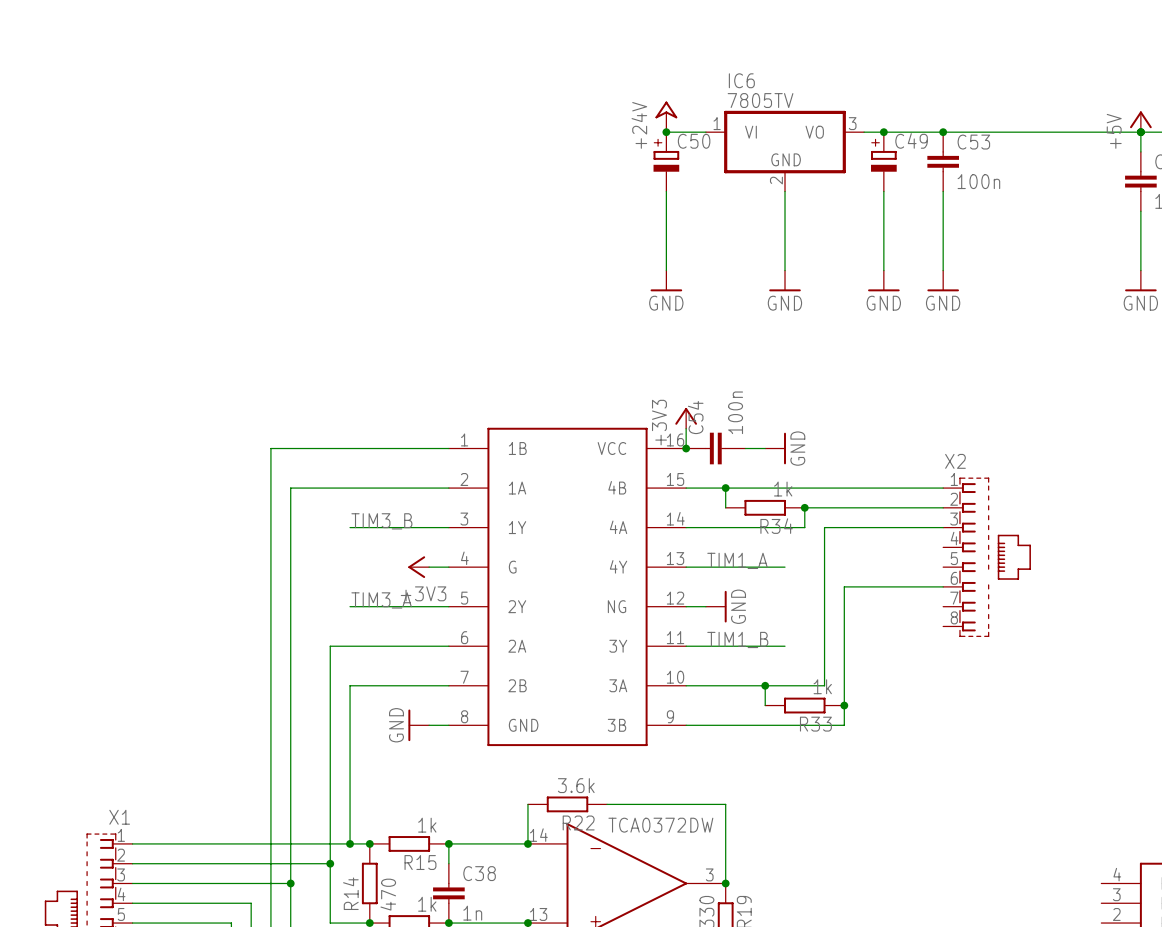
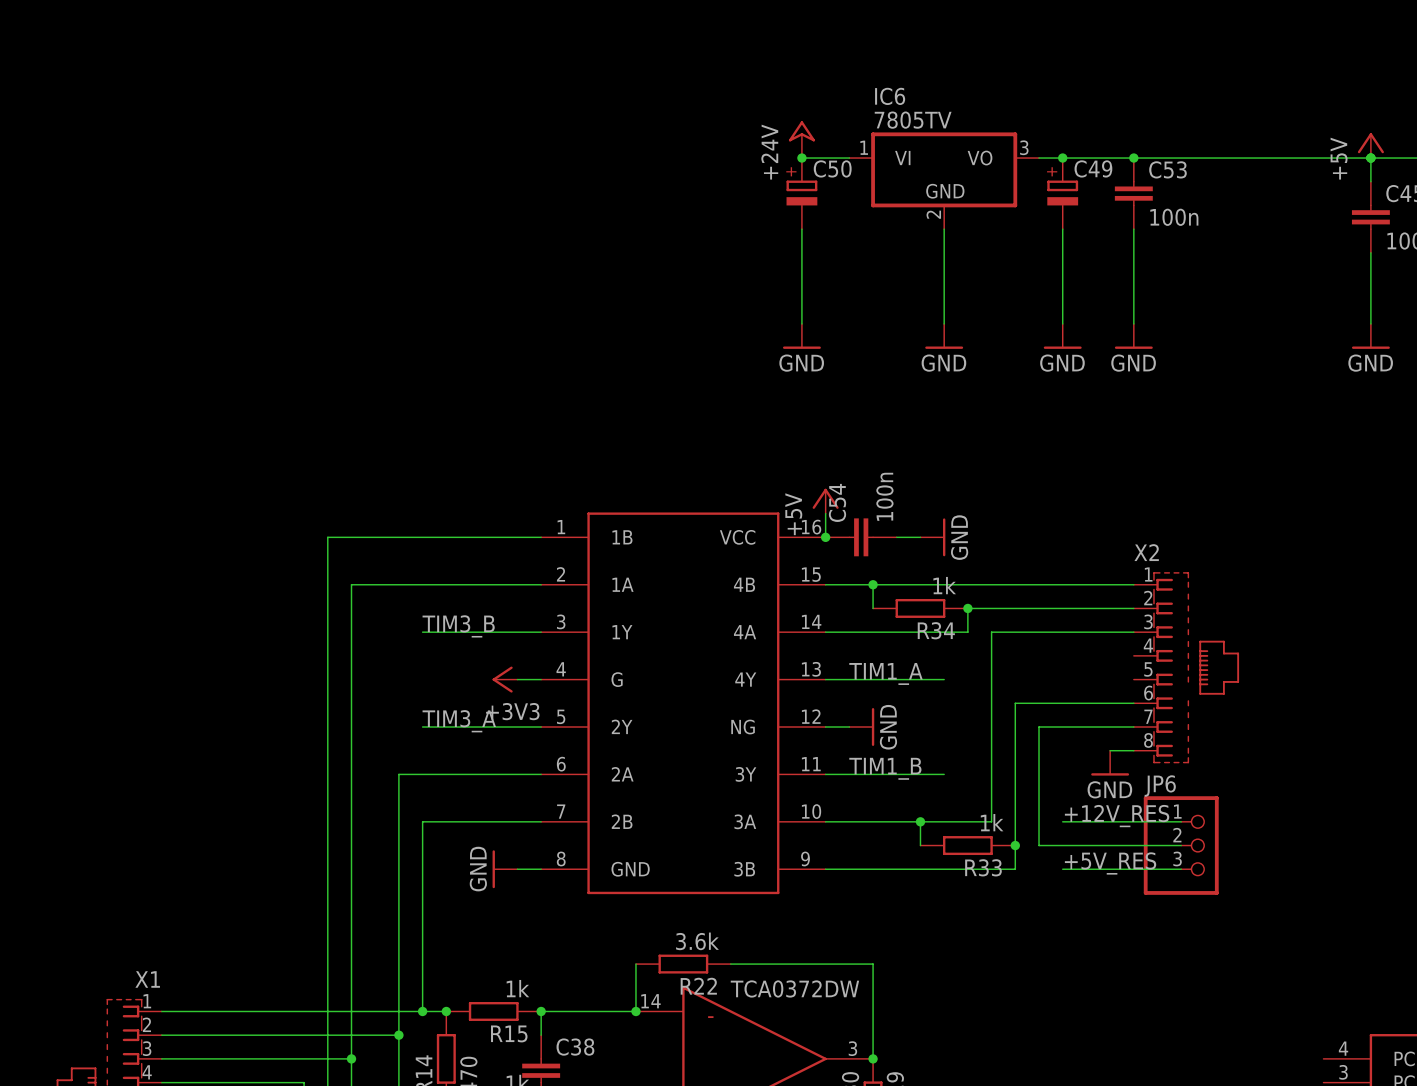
power symbol: +3V3 (686, 418) -> +5V (825, 501)
wire: none -> (1133, 727) (1039, 727) (1039, 845) (1181, 845)
wire: none -> (1110, 750) (1133, 750)
power symbol: none -> GND (1110, 763)
label: none -> +12V_RES (1117, 816)
wire: none -> (1062, 821) (1181, 821)
JP6: none -> (1181, 845)
label: none -> +5V_RES (1110, 863)
wire: none -> (1062, 869) (1181, 869)

